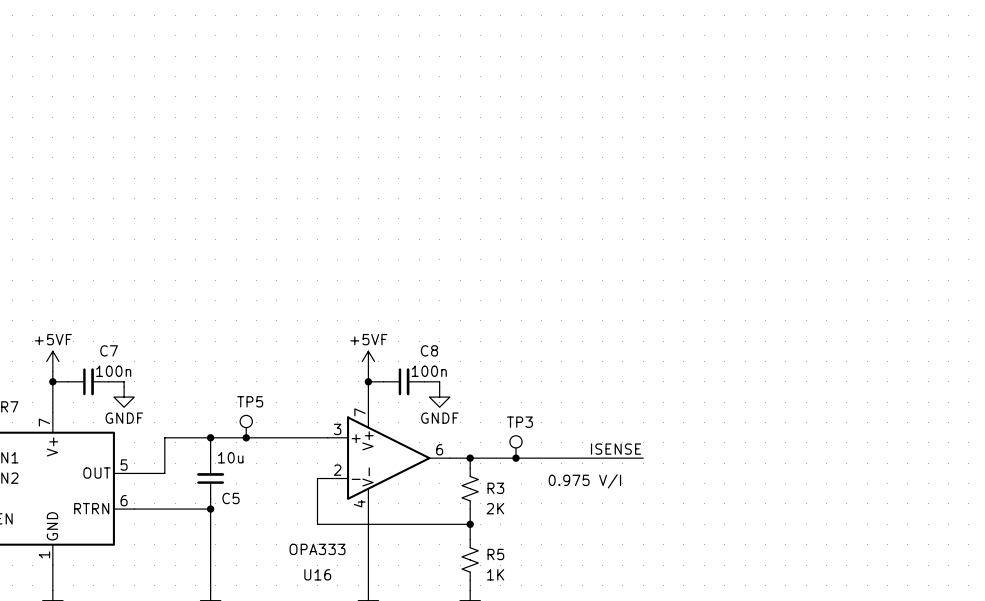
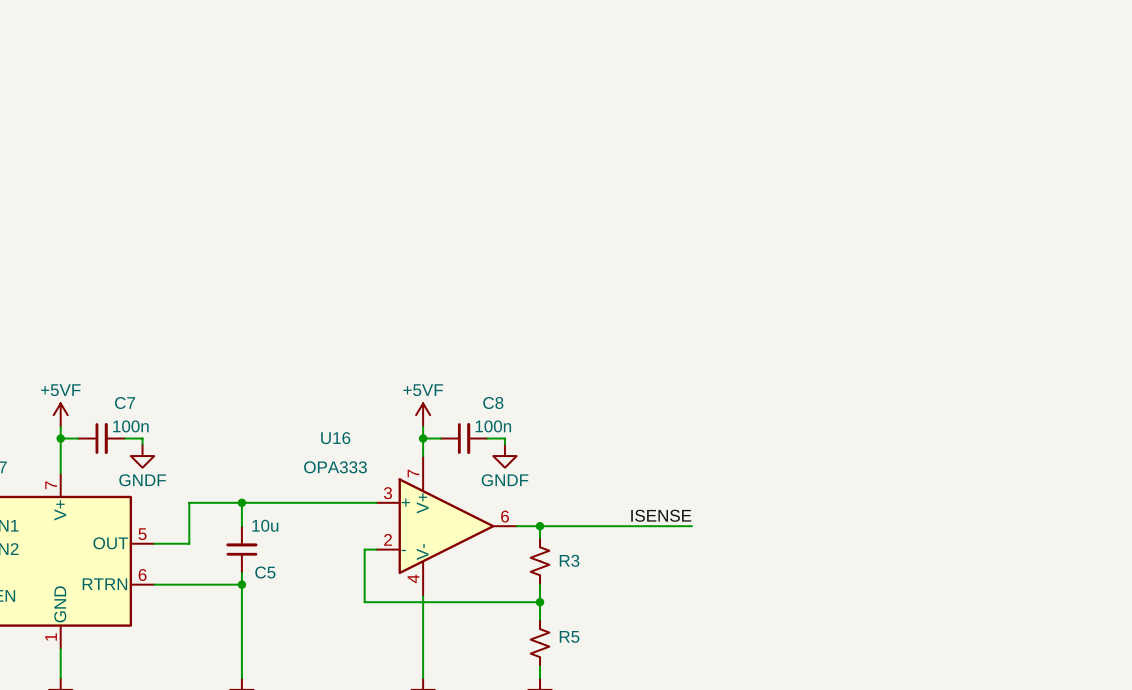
TP5: (246, 426) -> none
junction: (246, 437) -> none
TP3: (515, 446) -> none
label position: ISENSE (616, 449) -> ISENSE (661, 515)
junction: (515, 458) -> none
wire: (602, 458) (643, 458) -> none
text: 0.975 V/I (584, 481) -> none
R3 value: 2K (495, 508) -> none
U16 value position: OPA333 (317, 549) -> OPA333 (335, 467)
U16 name position: U16 (317, 574) -> U16 (335, 438)
R5 value: 1K (495, 574) -> none

